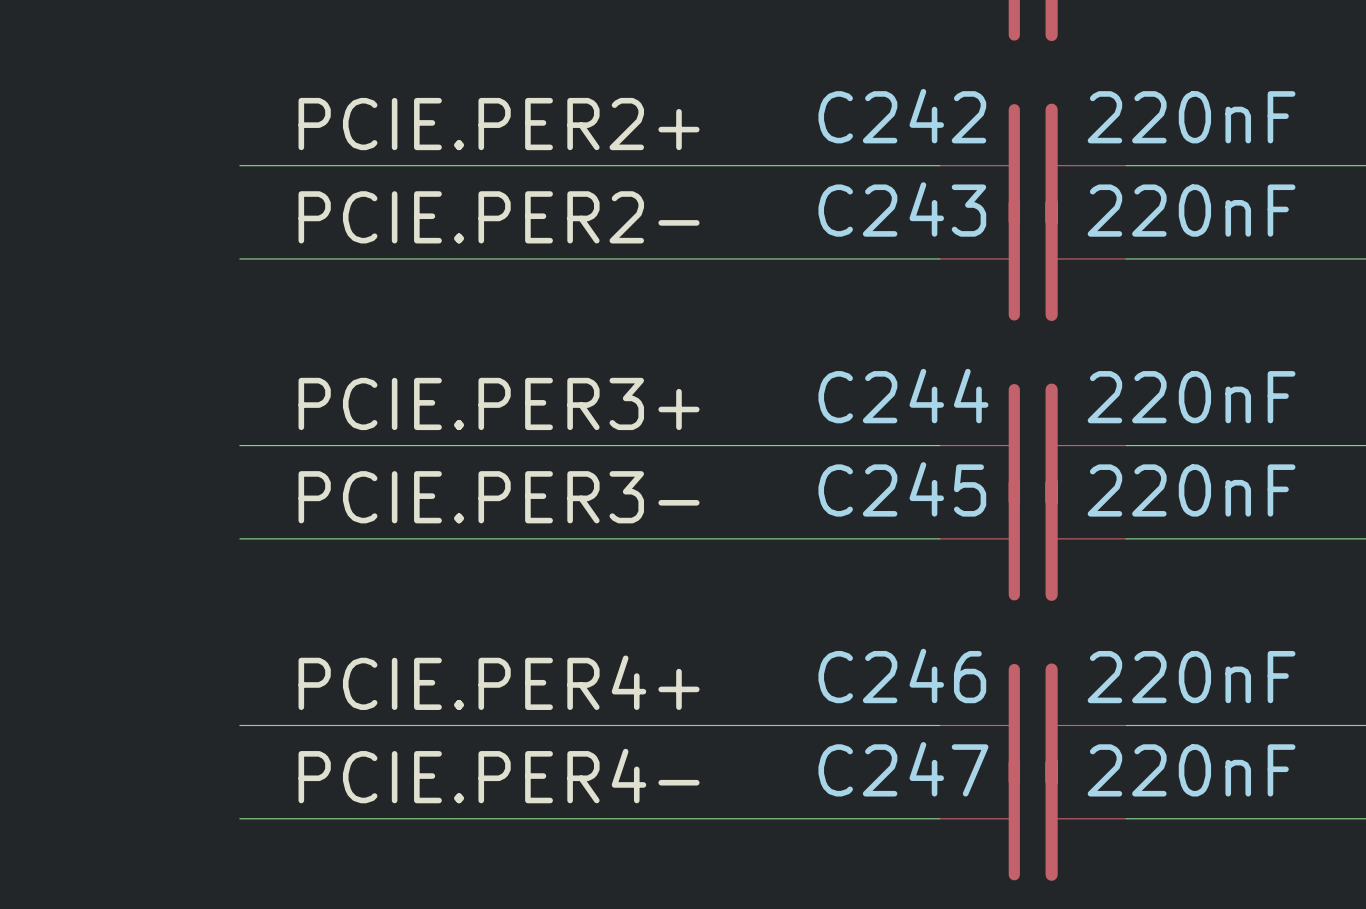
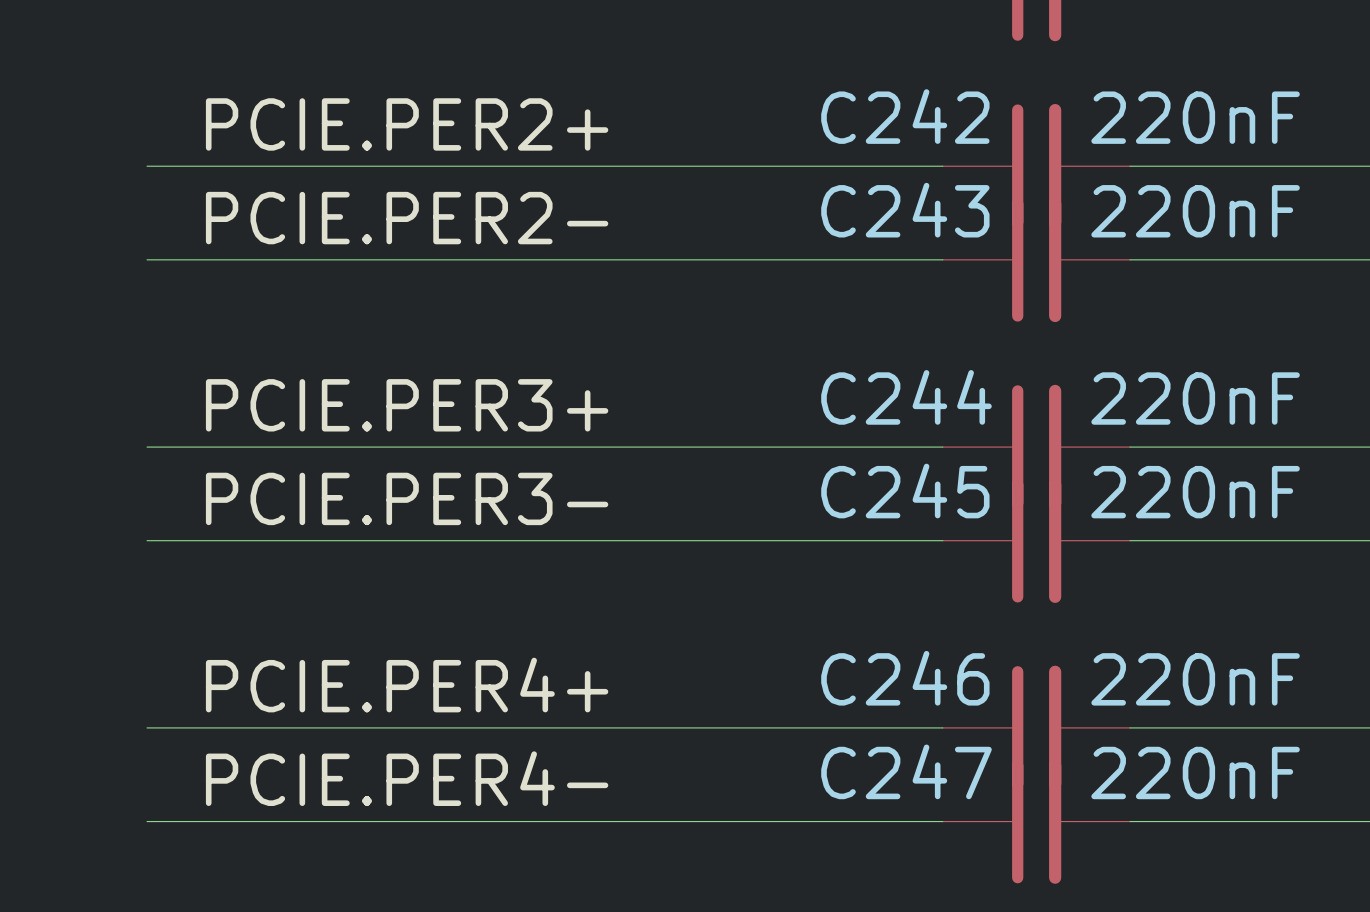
label position: PCIE.PER2+ (499, 124) -> PCIE.PER2+ (407, 124)
wire: none -> (147, 166) (240, 166)
label position: PCIE.PER2- (499, 217) -> PCIE.PER2- (407, 218)
wire: none -> (147, 259) (240, 259)
label position: PCIE.PER3+ (499, 403) -> PCIE.PER3+ (407, 405)
wire: none -> (147, 447) (240, 447)
label position: PCIE.PER3- (499, 497) -> PCIE.PER3- (407, 498)
wire: none -> (147, 540) (240, 540)
label position: PCIE.PER4+ (499, 682) -> PCIE.PER4+ (407, 685)
wire: none -> (147, 727) (240, 727)
label position: PCIE.PER4- (499, 776) -> PCIE.PER4- (407, 778)
wire: none -> (147, 821) (240, 821)

